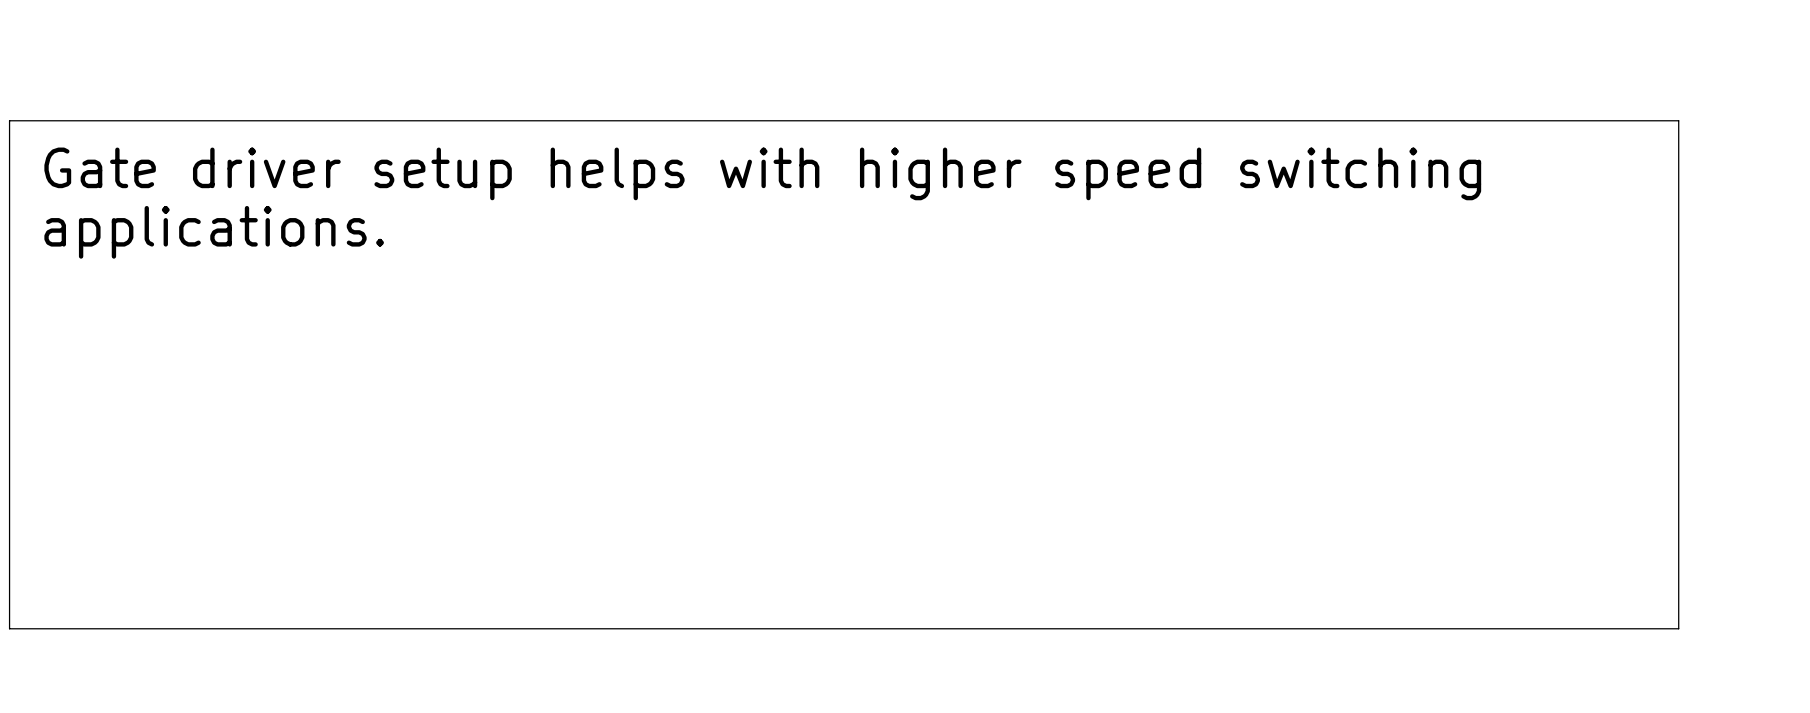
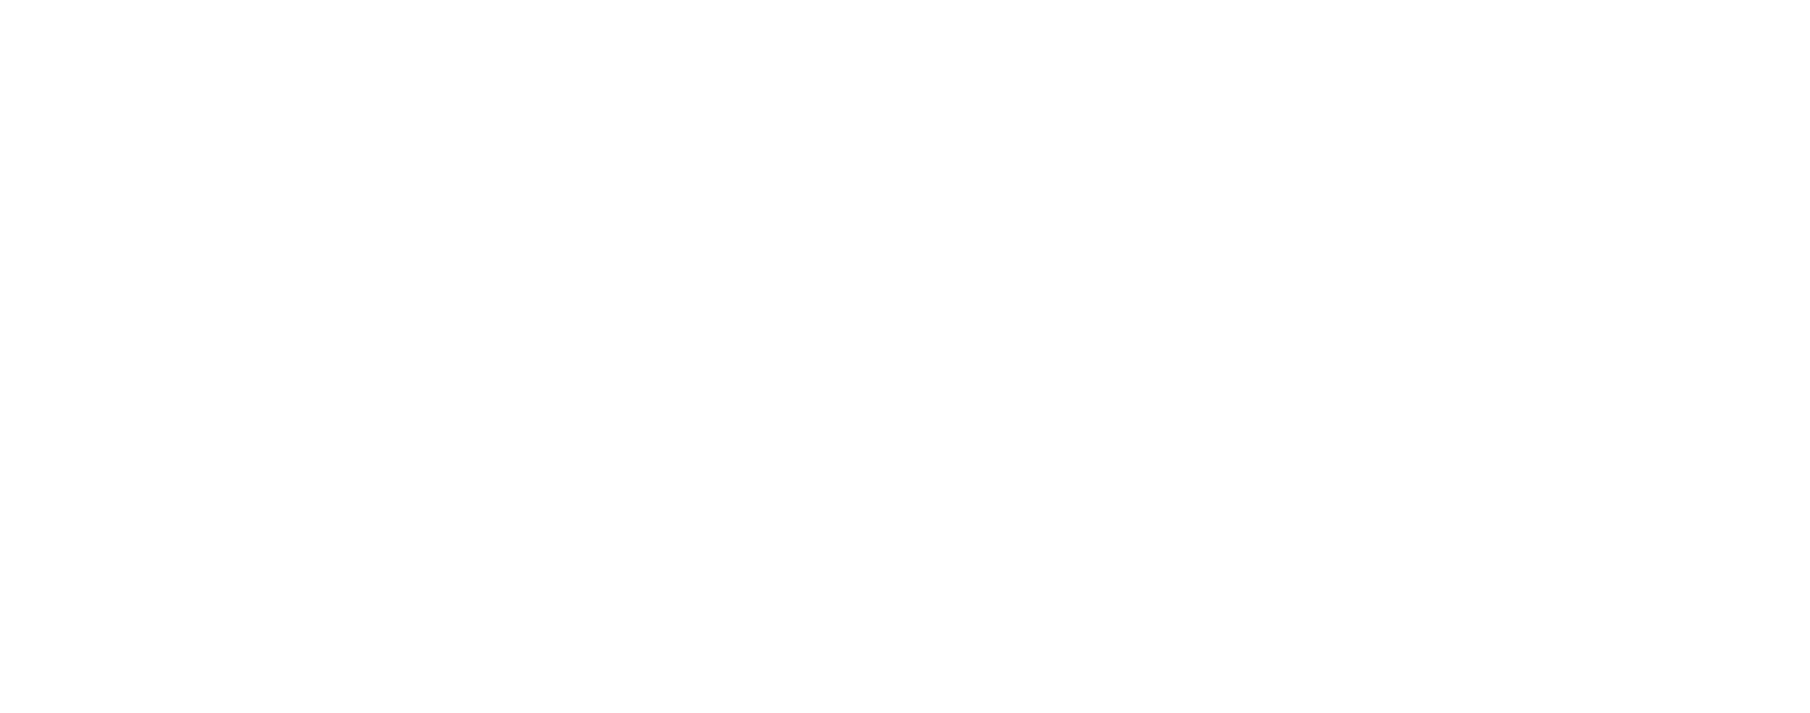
line: (9, 120) (1678, 120) (1678, 628) (9, 628) (9, 120) -> none
text: Gate driver setup helps with higher speed switching (762, 173) -> none
text: applications. (214, 232) -> none

